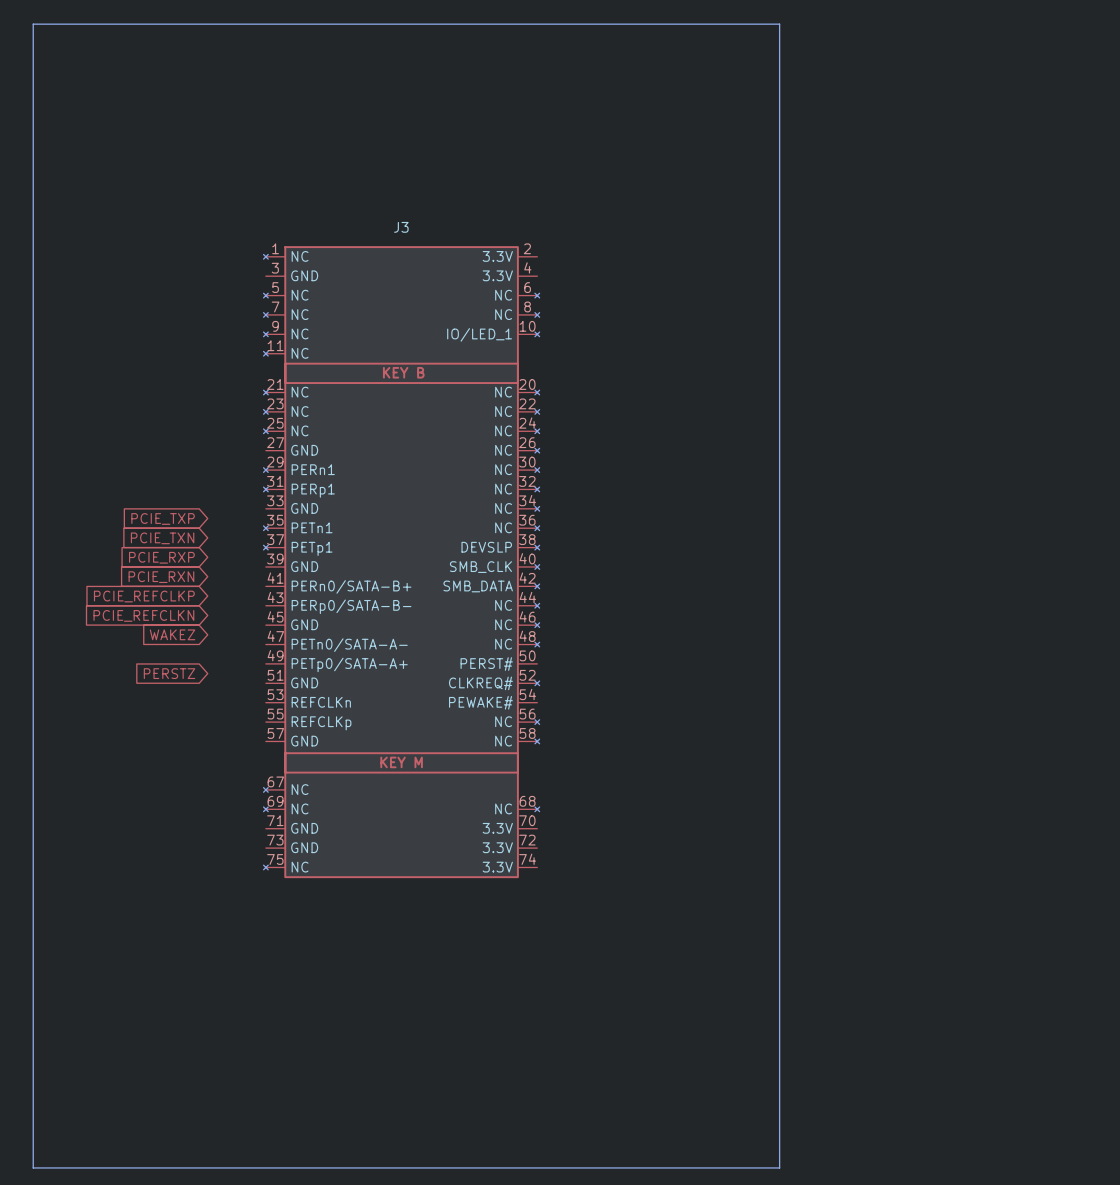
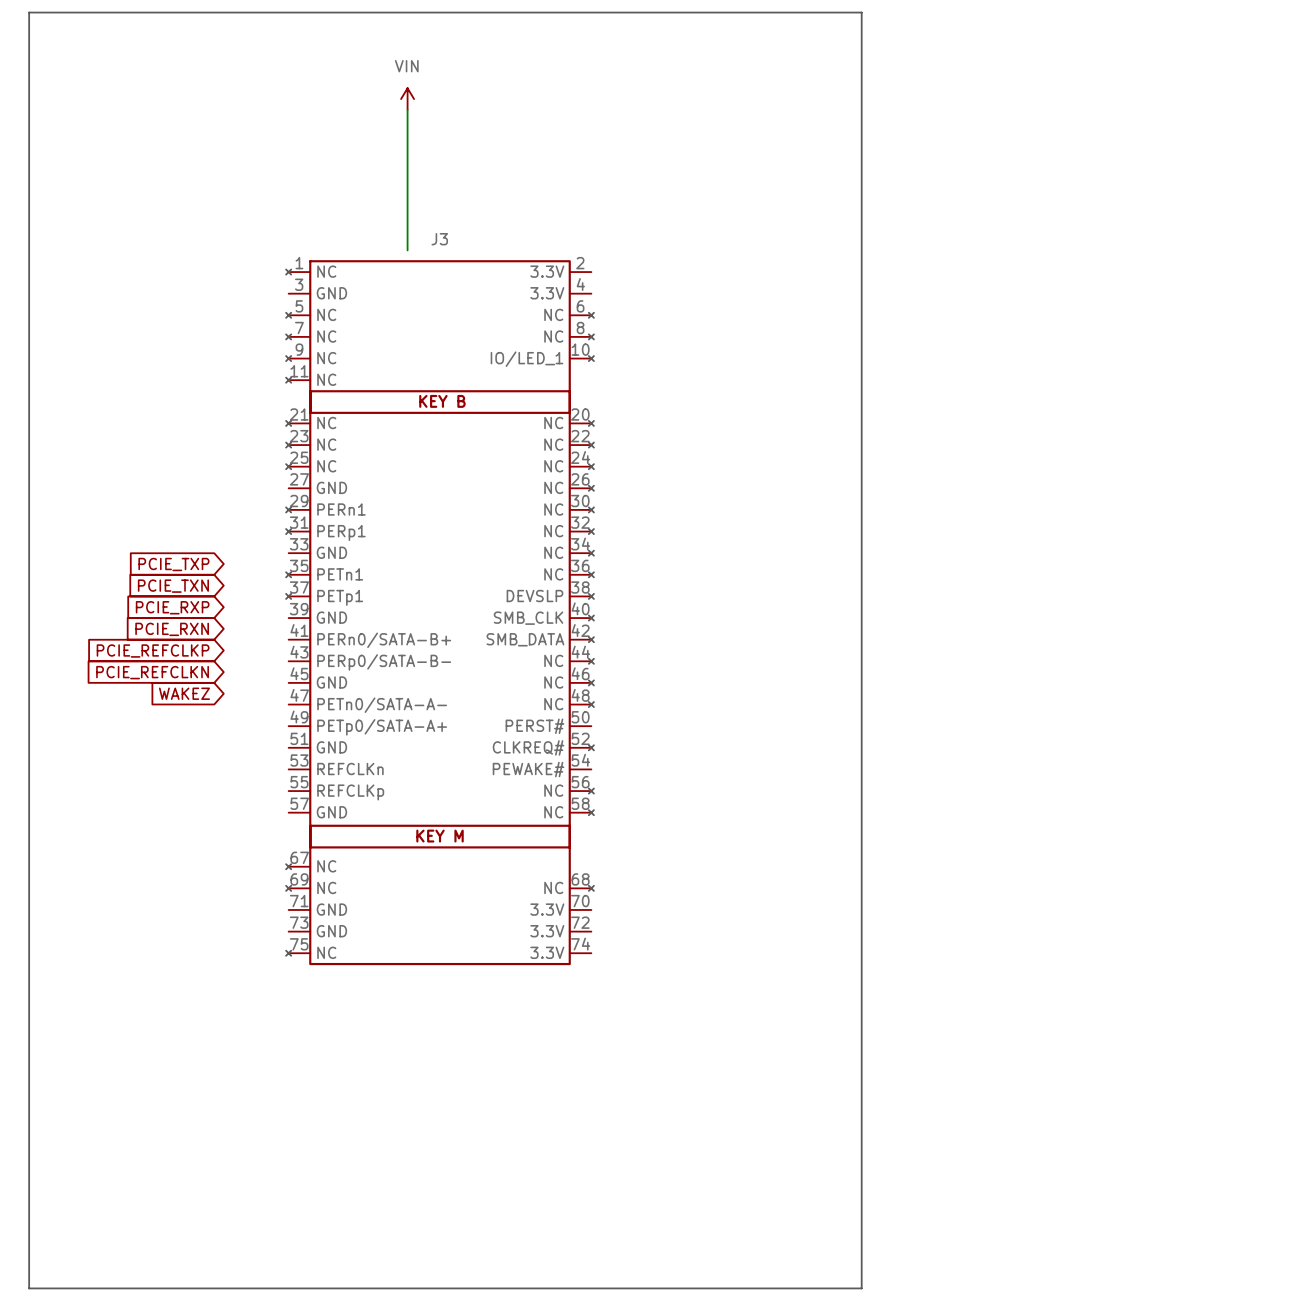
power symbol: none -> VIN (407, 99)
wire: none -> (407, 109) (407, 250)
global label: PERSTZ (169, 673) -> none

